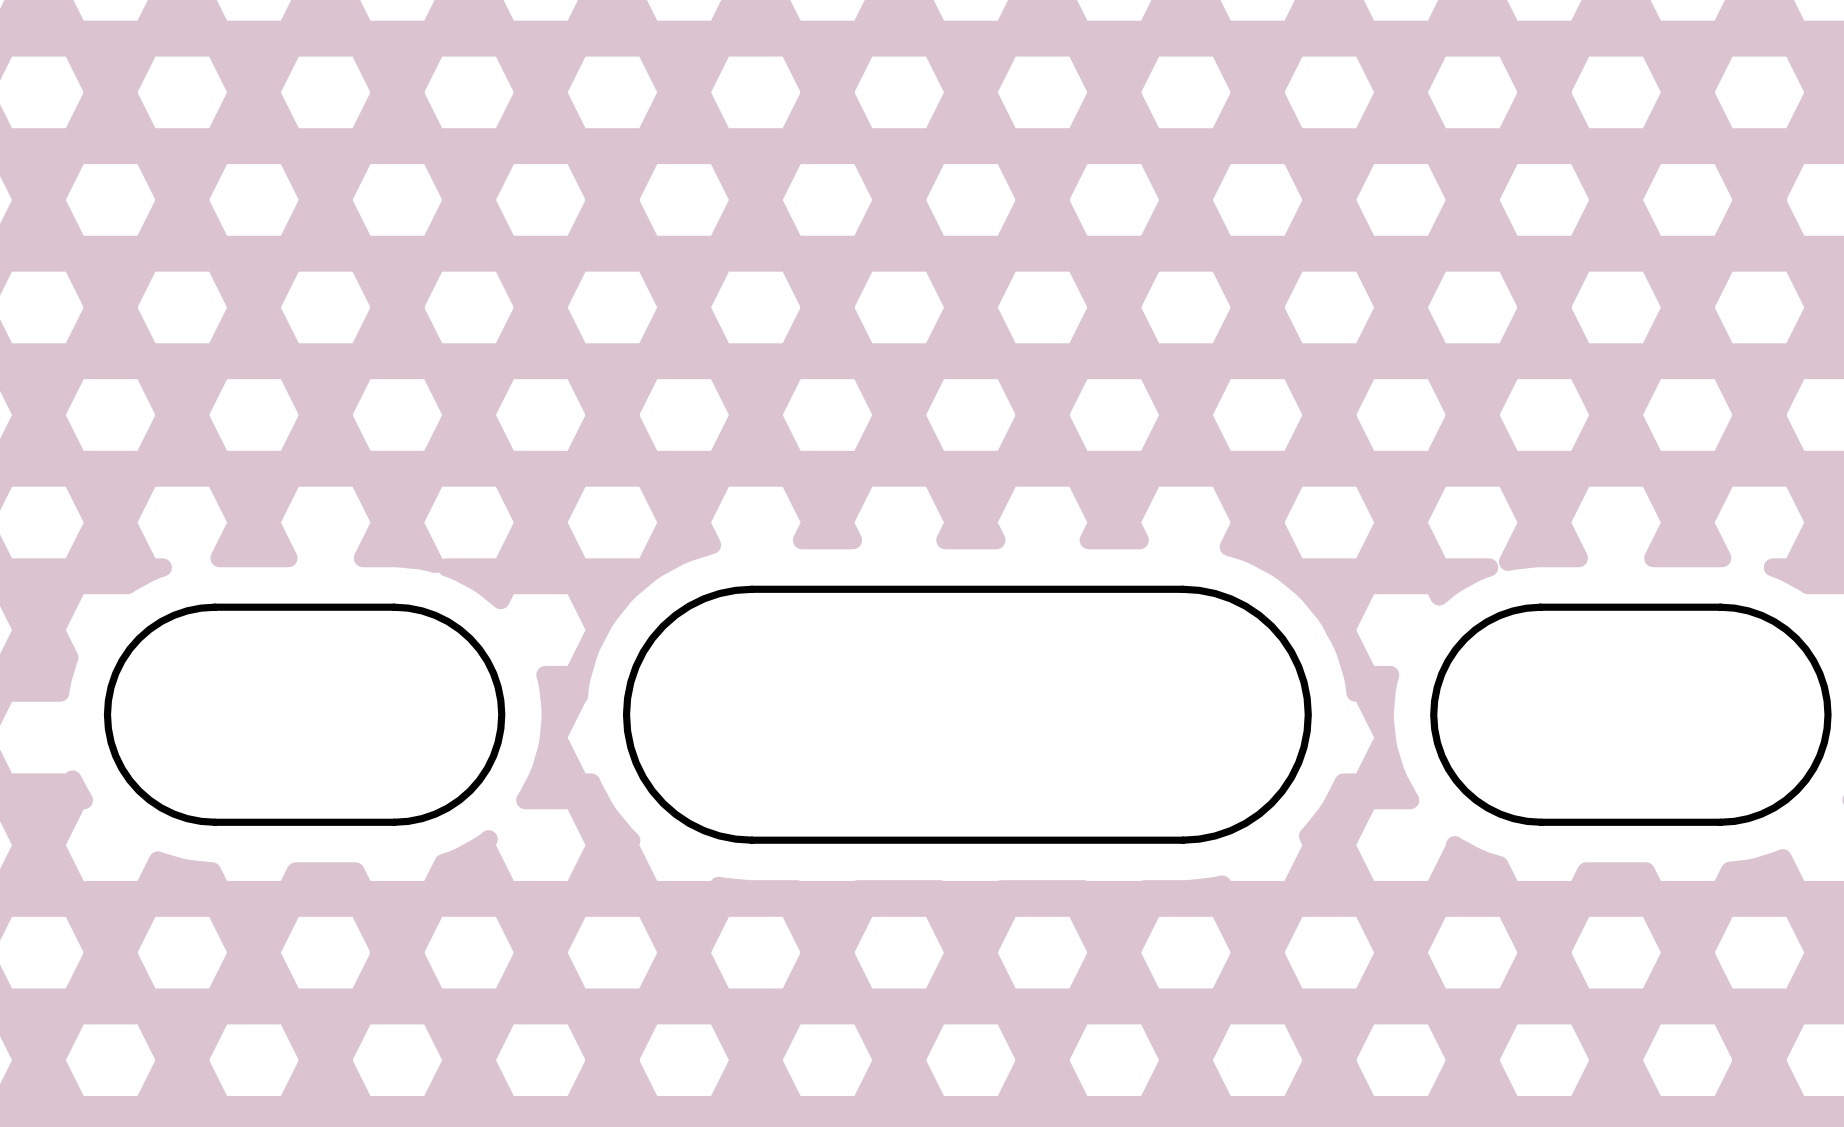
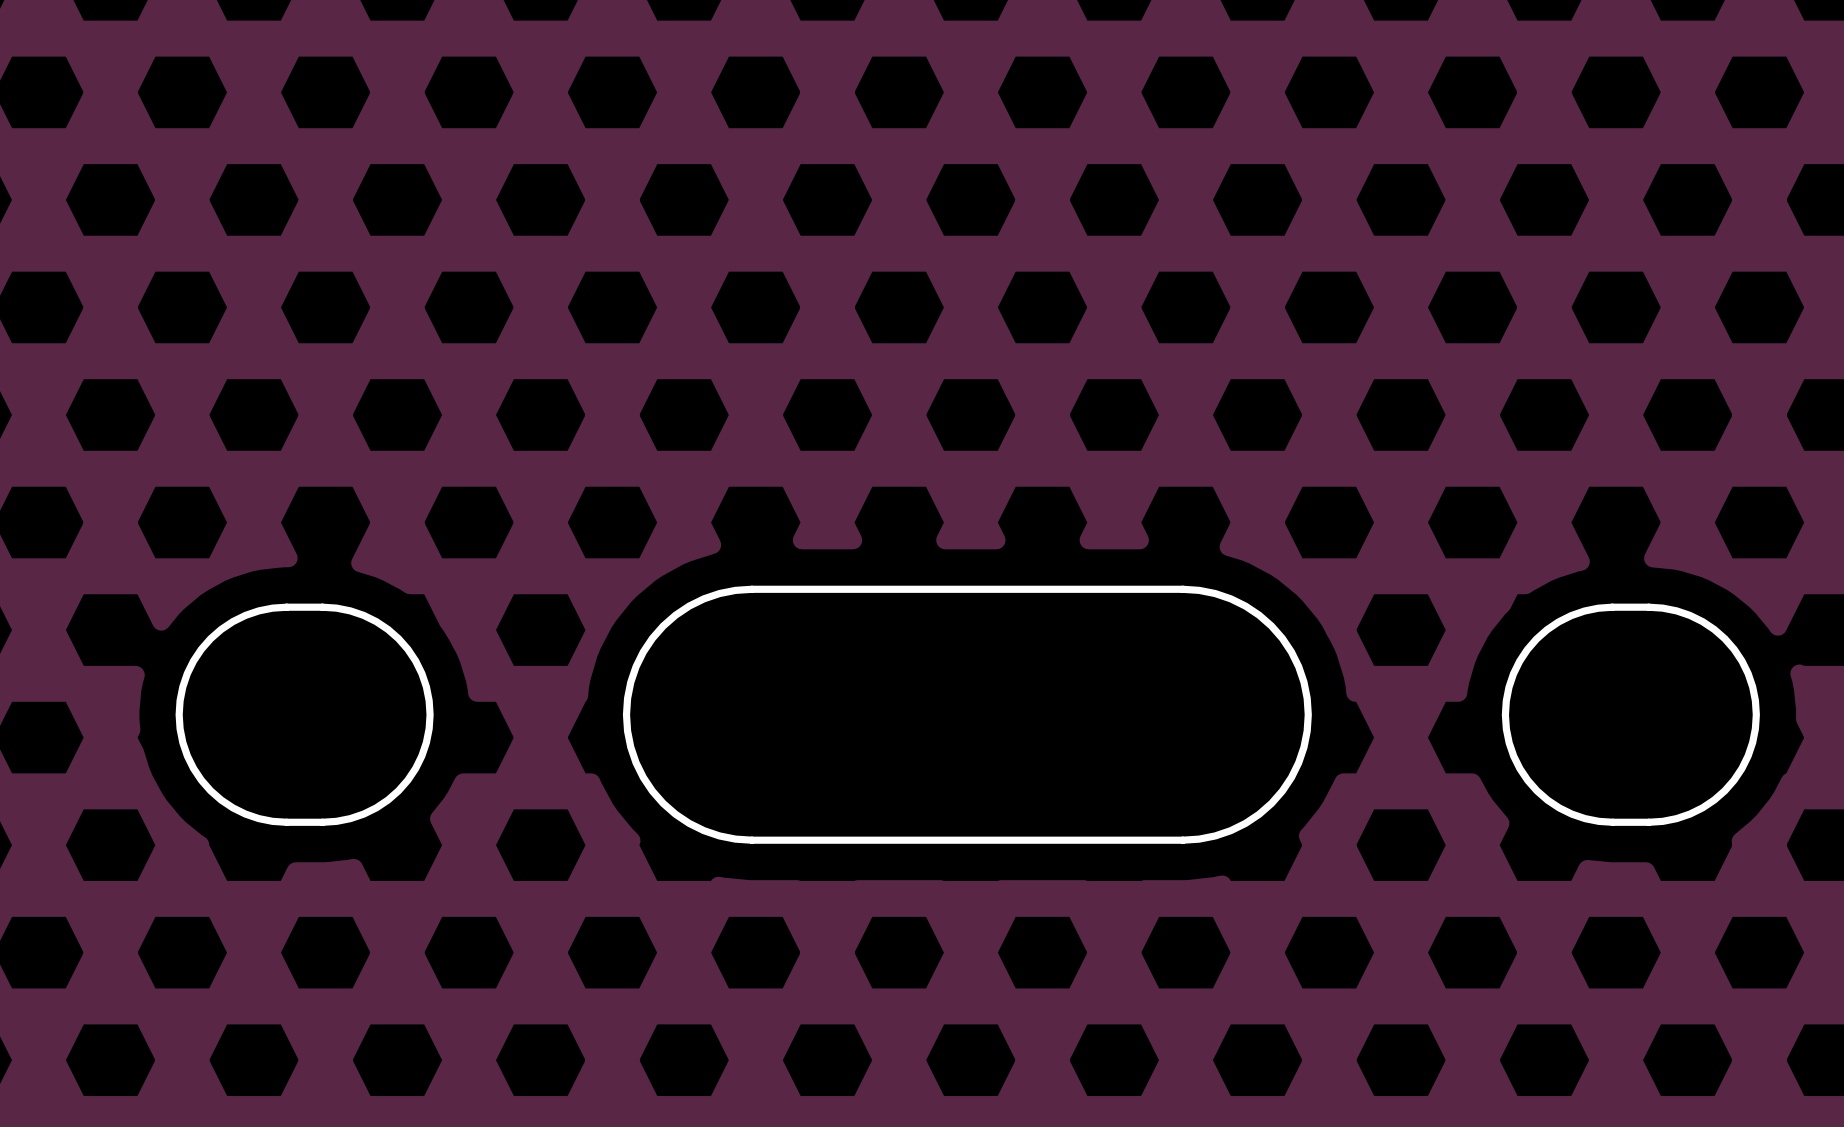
board edge: (286, 607) (200, 608) (173, 615) (161, 621) (138, 638) (121, 660) (111, 686) (107, 714) (111, 742) (121, 768) (138, 790) (161, 807) (173, 814) (200, 821) (286, 822) -> (286, 607) (272, 608) (245, 615) (221, 629) (210, 638) (193, 660) (187, 673) (182, 686) (179, 714) (182, 742) (187, 755) (193, 768) (210, 790) (221, 800) (245, 814) (272, 821) (286, 822)
board edge: (322, 607) (408, 608) (435, 615) (447, 621) (470, 638) (487, 660) (498, 686) (501, 714) (498, 742) (487, 768) (470, 790) (447, 807) (435, 814) (408, 821) (322, 822) -> (322, 607) (336, 608) (363, 615) (388, 629) (398, 638) (415, 660) (421, 673) (426, 686) (430, 714) (426, 742) (421, 755) (415, 768) (398, 790) (388, 800) (363, 814) (336, 821) (322, 822)
board edge: (1612, 607) (1540, 607) (1512, 611) (1486, 621) (1464, 639) (1447, 661) (1441, 674) (1434, 701) (1433, 715) (1437, 742) (1448, 768) (1456, 780) (1465, 790) (1487, 807) (1500, 814) (1527, 821) (1720, 822) (1748, 818) (1774, 807) (1796, 790) (1805, 780) (1813, 768) (1824, 742) (1828, 714) (1827, 700) (1819, 673) (1813, 660) (1796, 638) (1785, 629) (1761, 615) (1748, 610) (1720, 607) (1648, 607) -> (1612, 607) (1598, 608) (1571, 615) (1558, 621) (1536, 639) (1519, 661) (1513, 674) (1506, 701) (1505, 715) (1509, 742) (1513, 756) (1519, 768) (1537, 790) (1559, 807) (1571, 814) (1598, 821) (1612, 822) (1662, 821) (1689, 814) (1702, 807) (1724, 790) (1741, 768) (1748, 755) (1755, 728) (1755, 700) (1748, 673) (1741, 660) (1724, 638) (1714, 629) (1689, 615) (1662, 608) (1648, 607)

